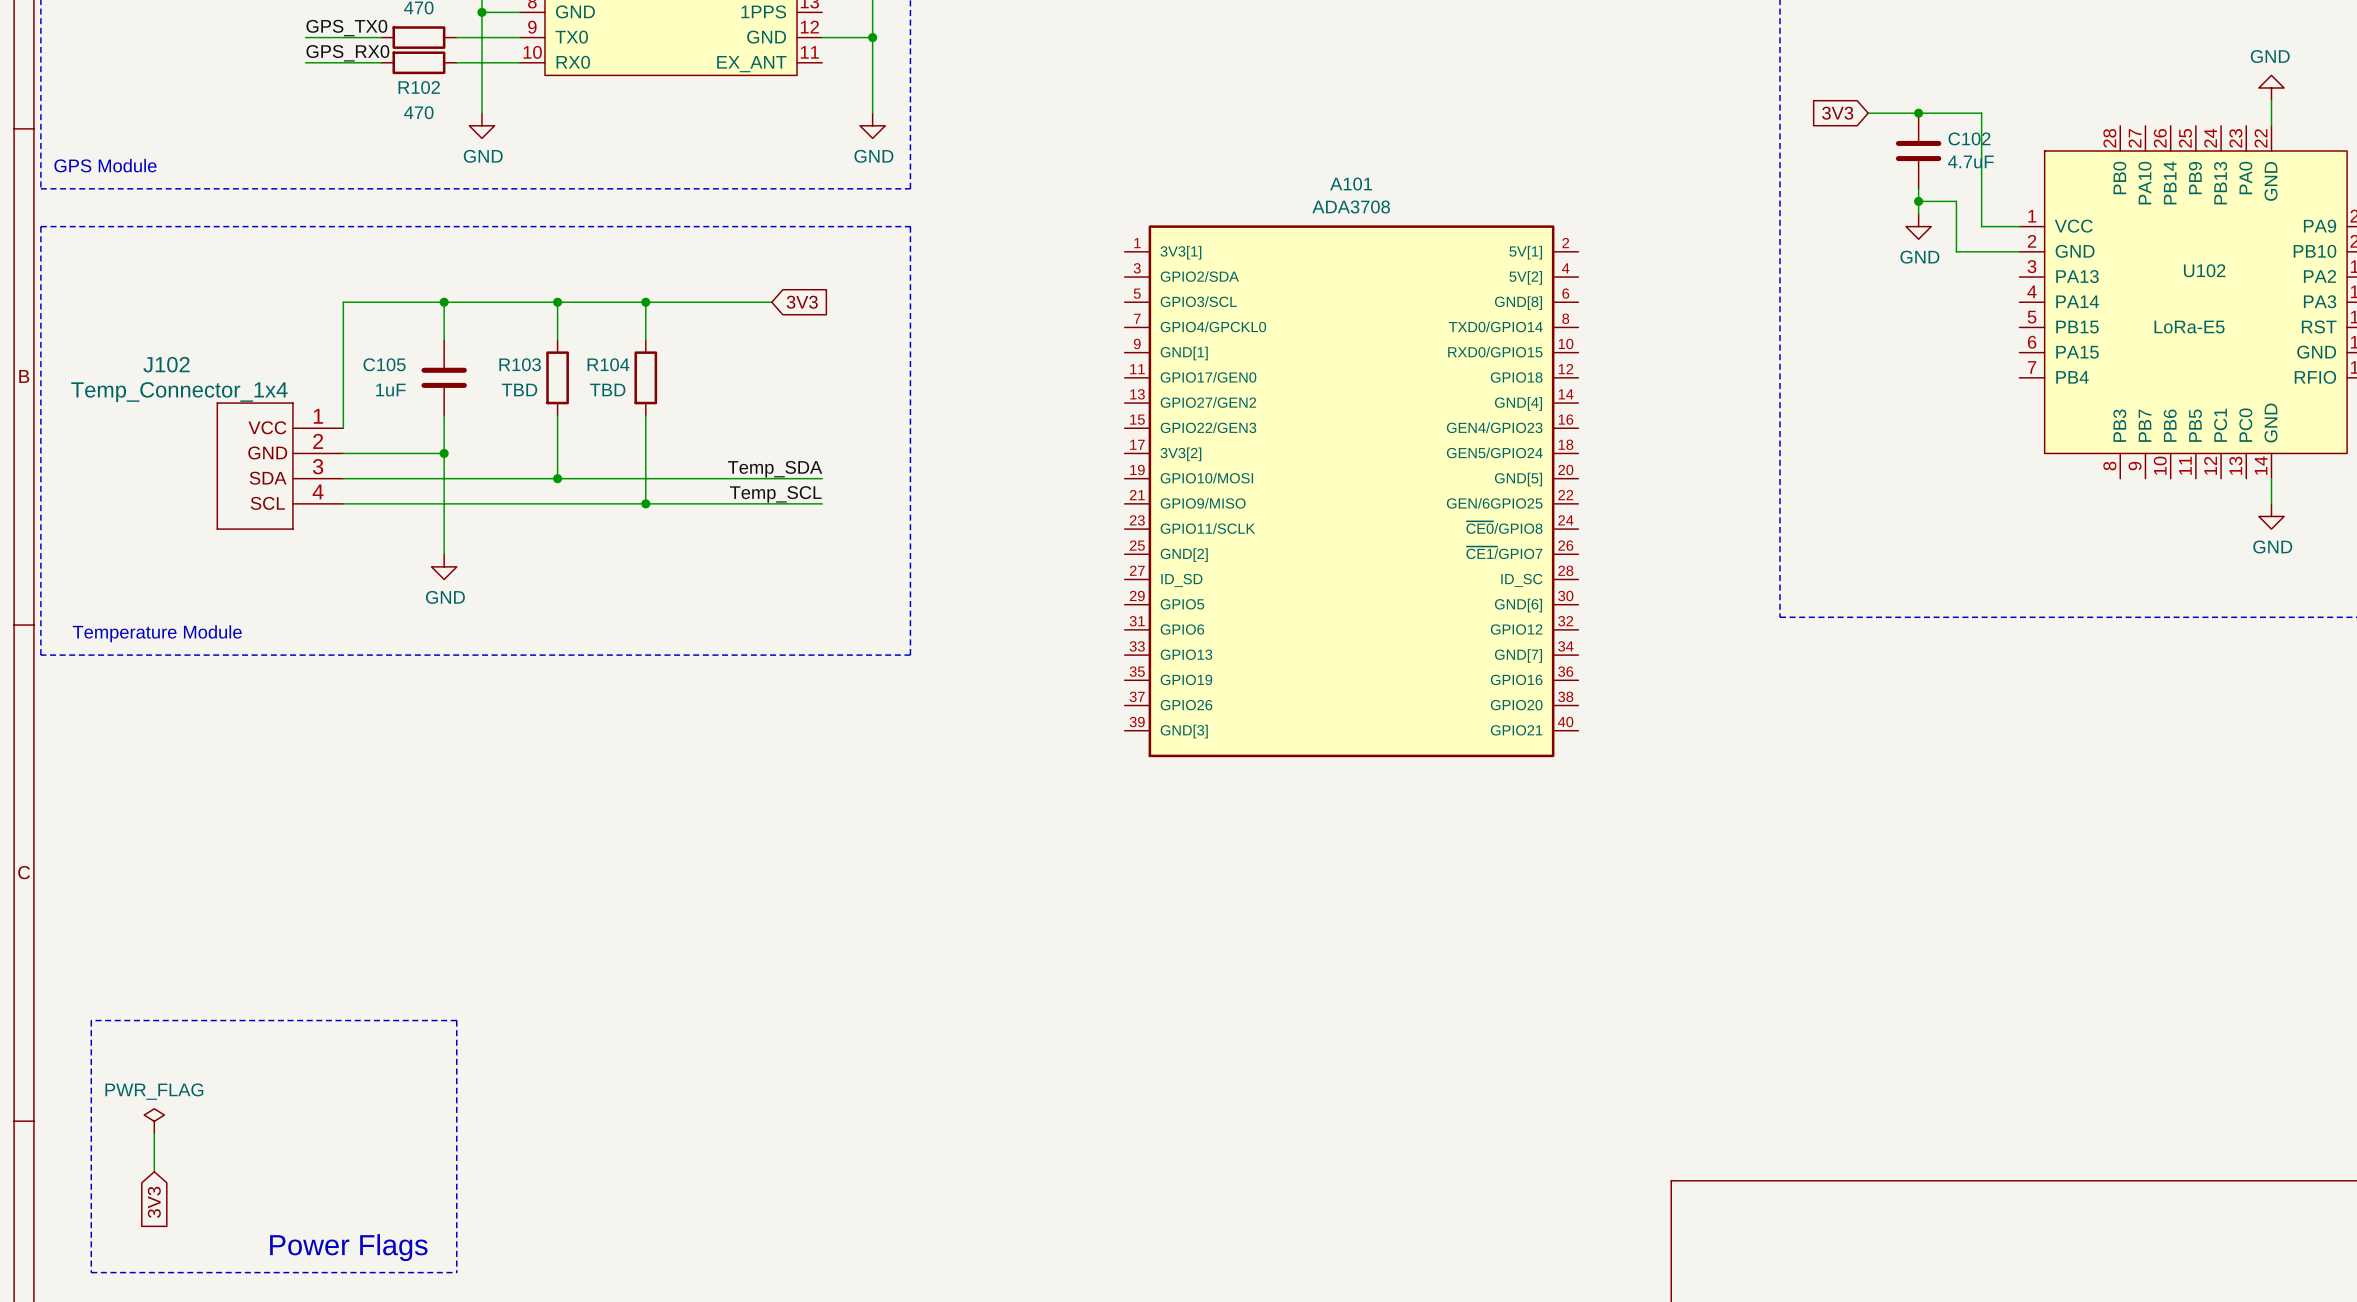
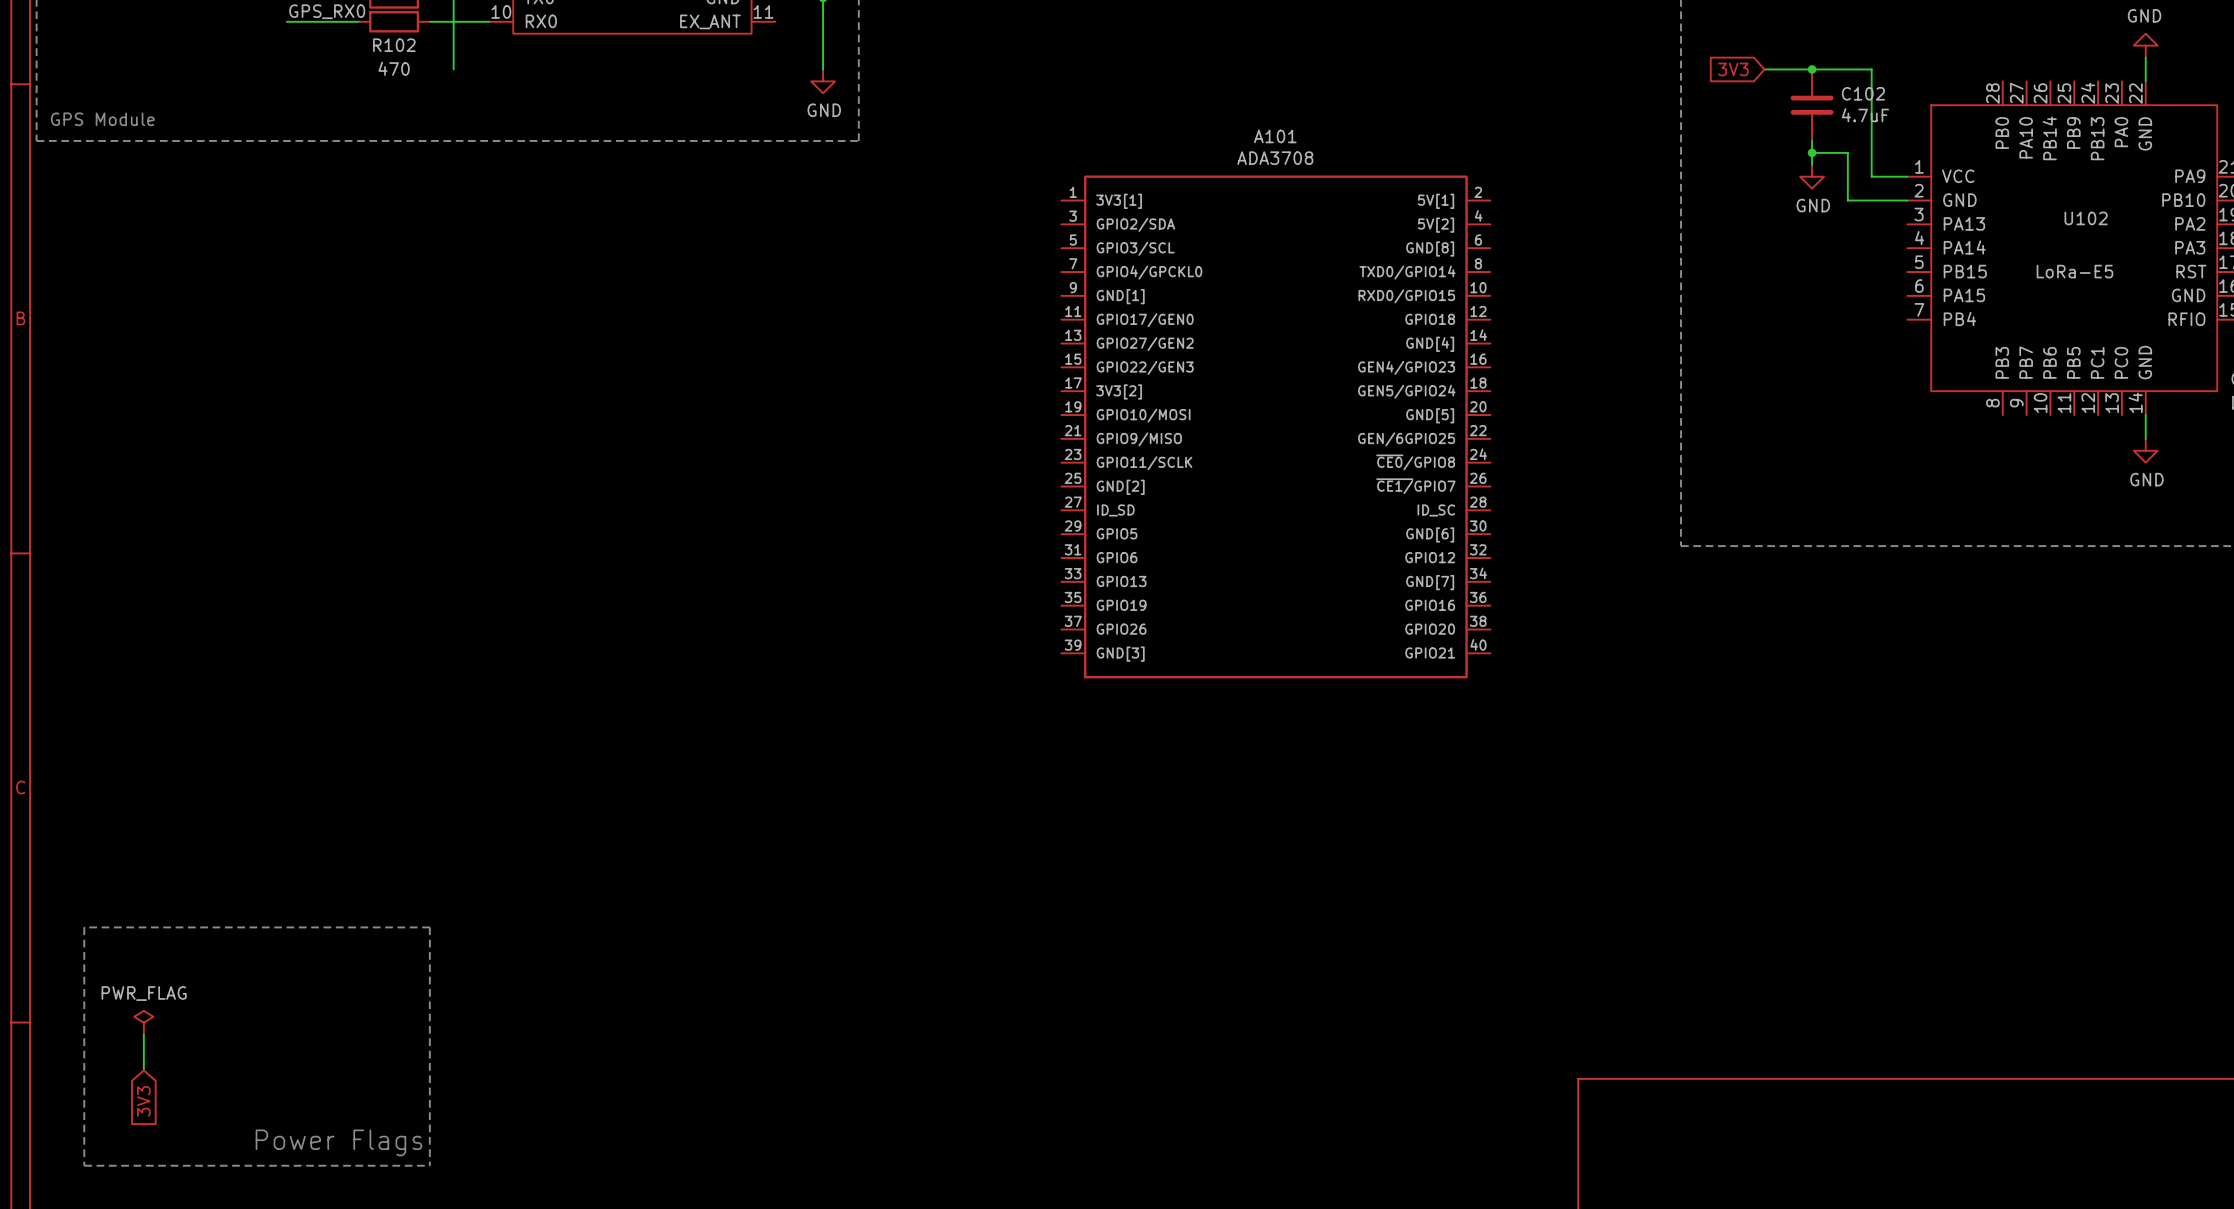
power symbol: GND (481, 125) -> none
line: (40, 226) (910, 226) (910, 655) (40, 655) (40, 226) -> none
wire: (444, 302) (444, 340) -> none
junction: (444, 302) -> none
wire: (557, 302) (557, 340) -> none
junction: (557, 302) -> none
wire: (645, 302) (645, 340) -> none
junction: (645, 302) -> none
wire: (771, 302) (343, 302) (343, 428) -> none
global label: 3V3 (802, 302) -> none
C105: 1uF (444, 377) -> none
R103: TBD (557, 377) -> none
R104: TBD (645, 377) -> none
wire: (444, 415) (444, 554) -> none
wire: (557, 415) (557, 478) -> none
wire: (645, 415) (645, 503) -> none
wire: (343, 453) (444, 453) -> none
junction: (444, 453) -> none
J102: Temp_Connector_1x4 (280, 466) -> none
label: Temp_SDA (775, 469) -> none
wire: (343, 478) (822, 478) -> none
junction: (557, 478) -> none
label: Temp_SCL (775, 494) -> none
wire: (343, 503) (822, 503) -> none
junction: (645, 503) -> none
power symbol: GND (444, 566) -> none
text: Temperature Module (157, 633) -> none

